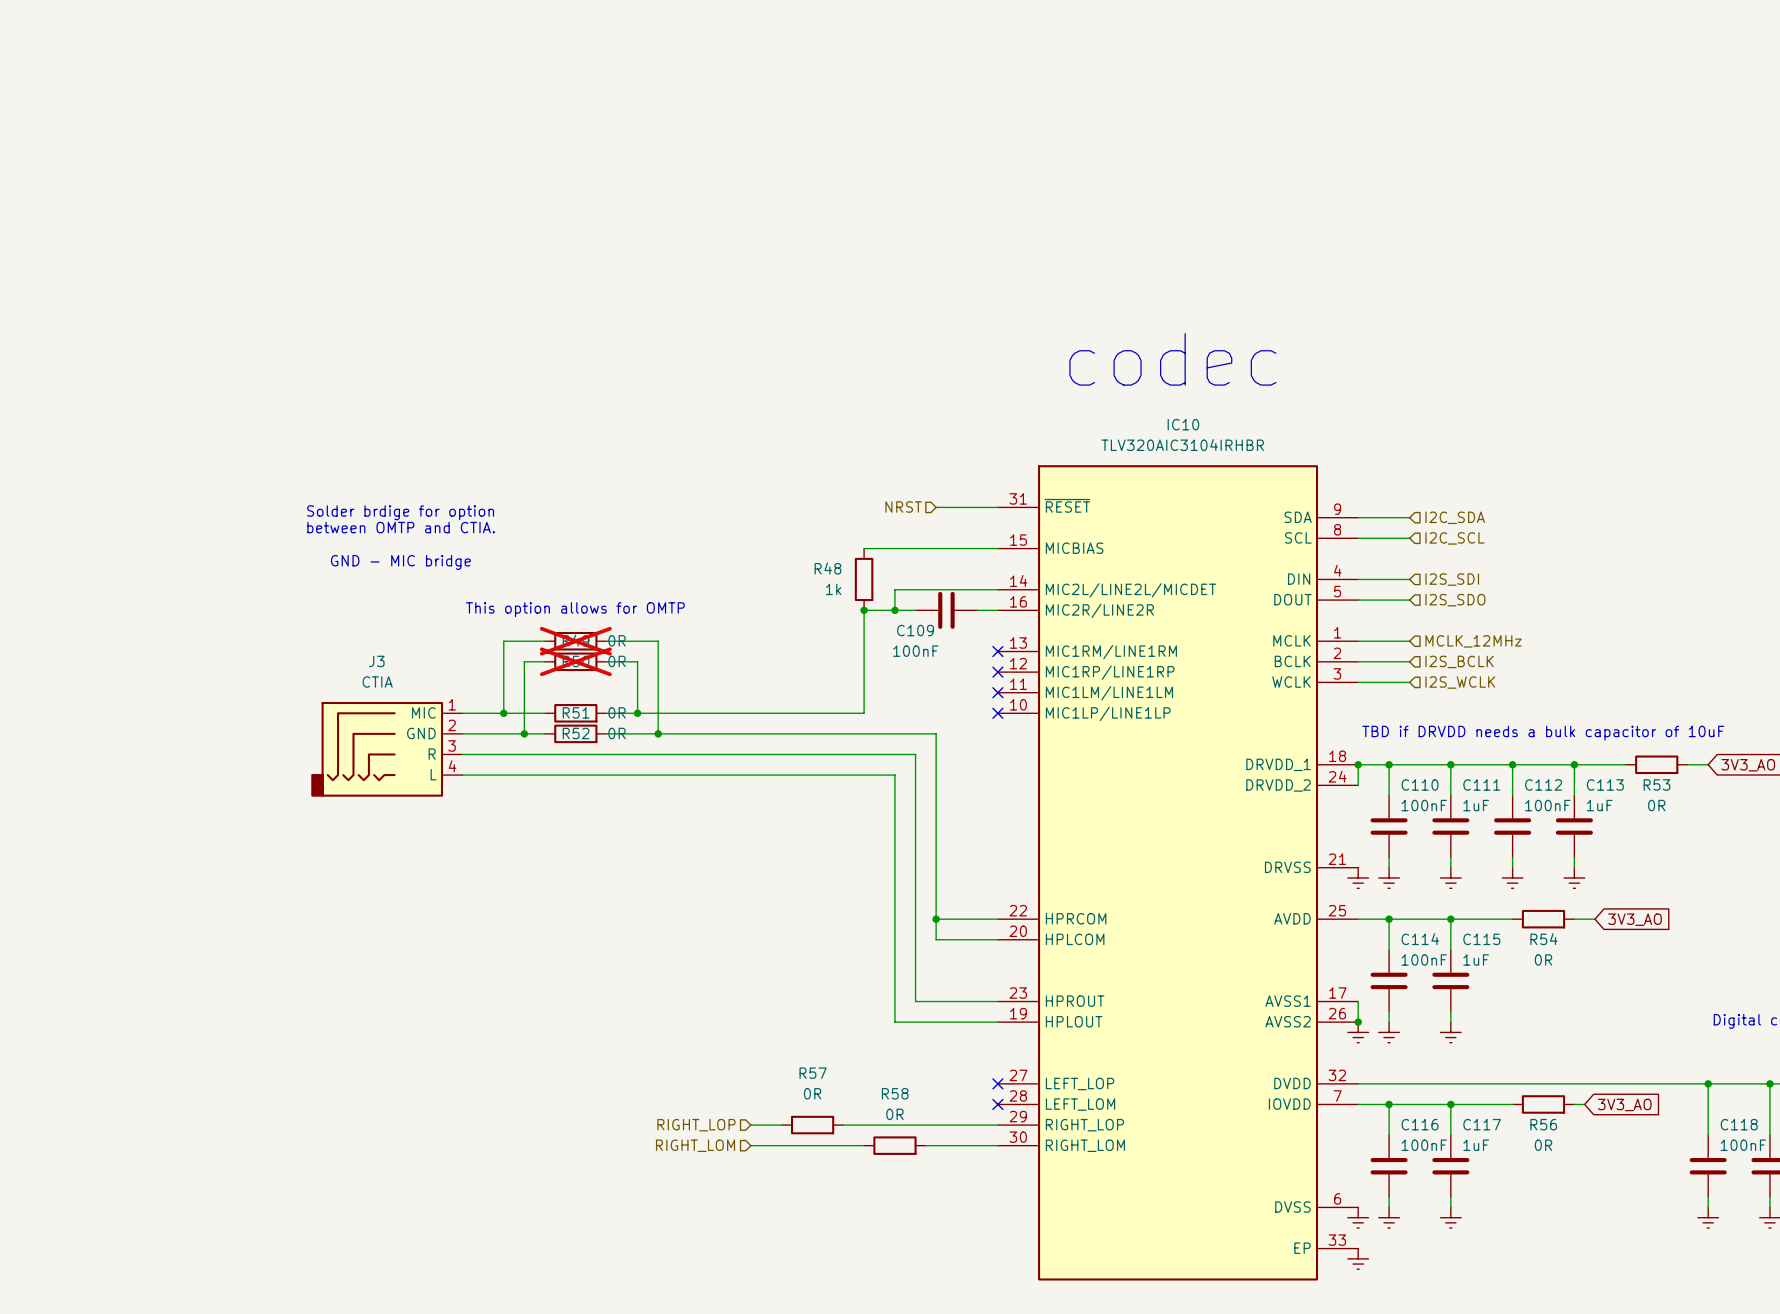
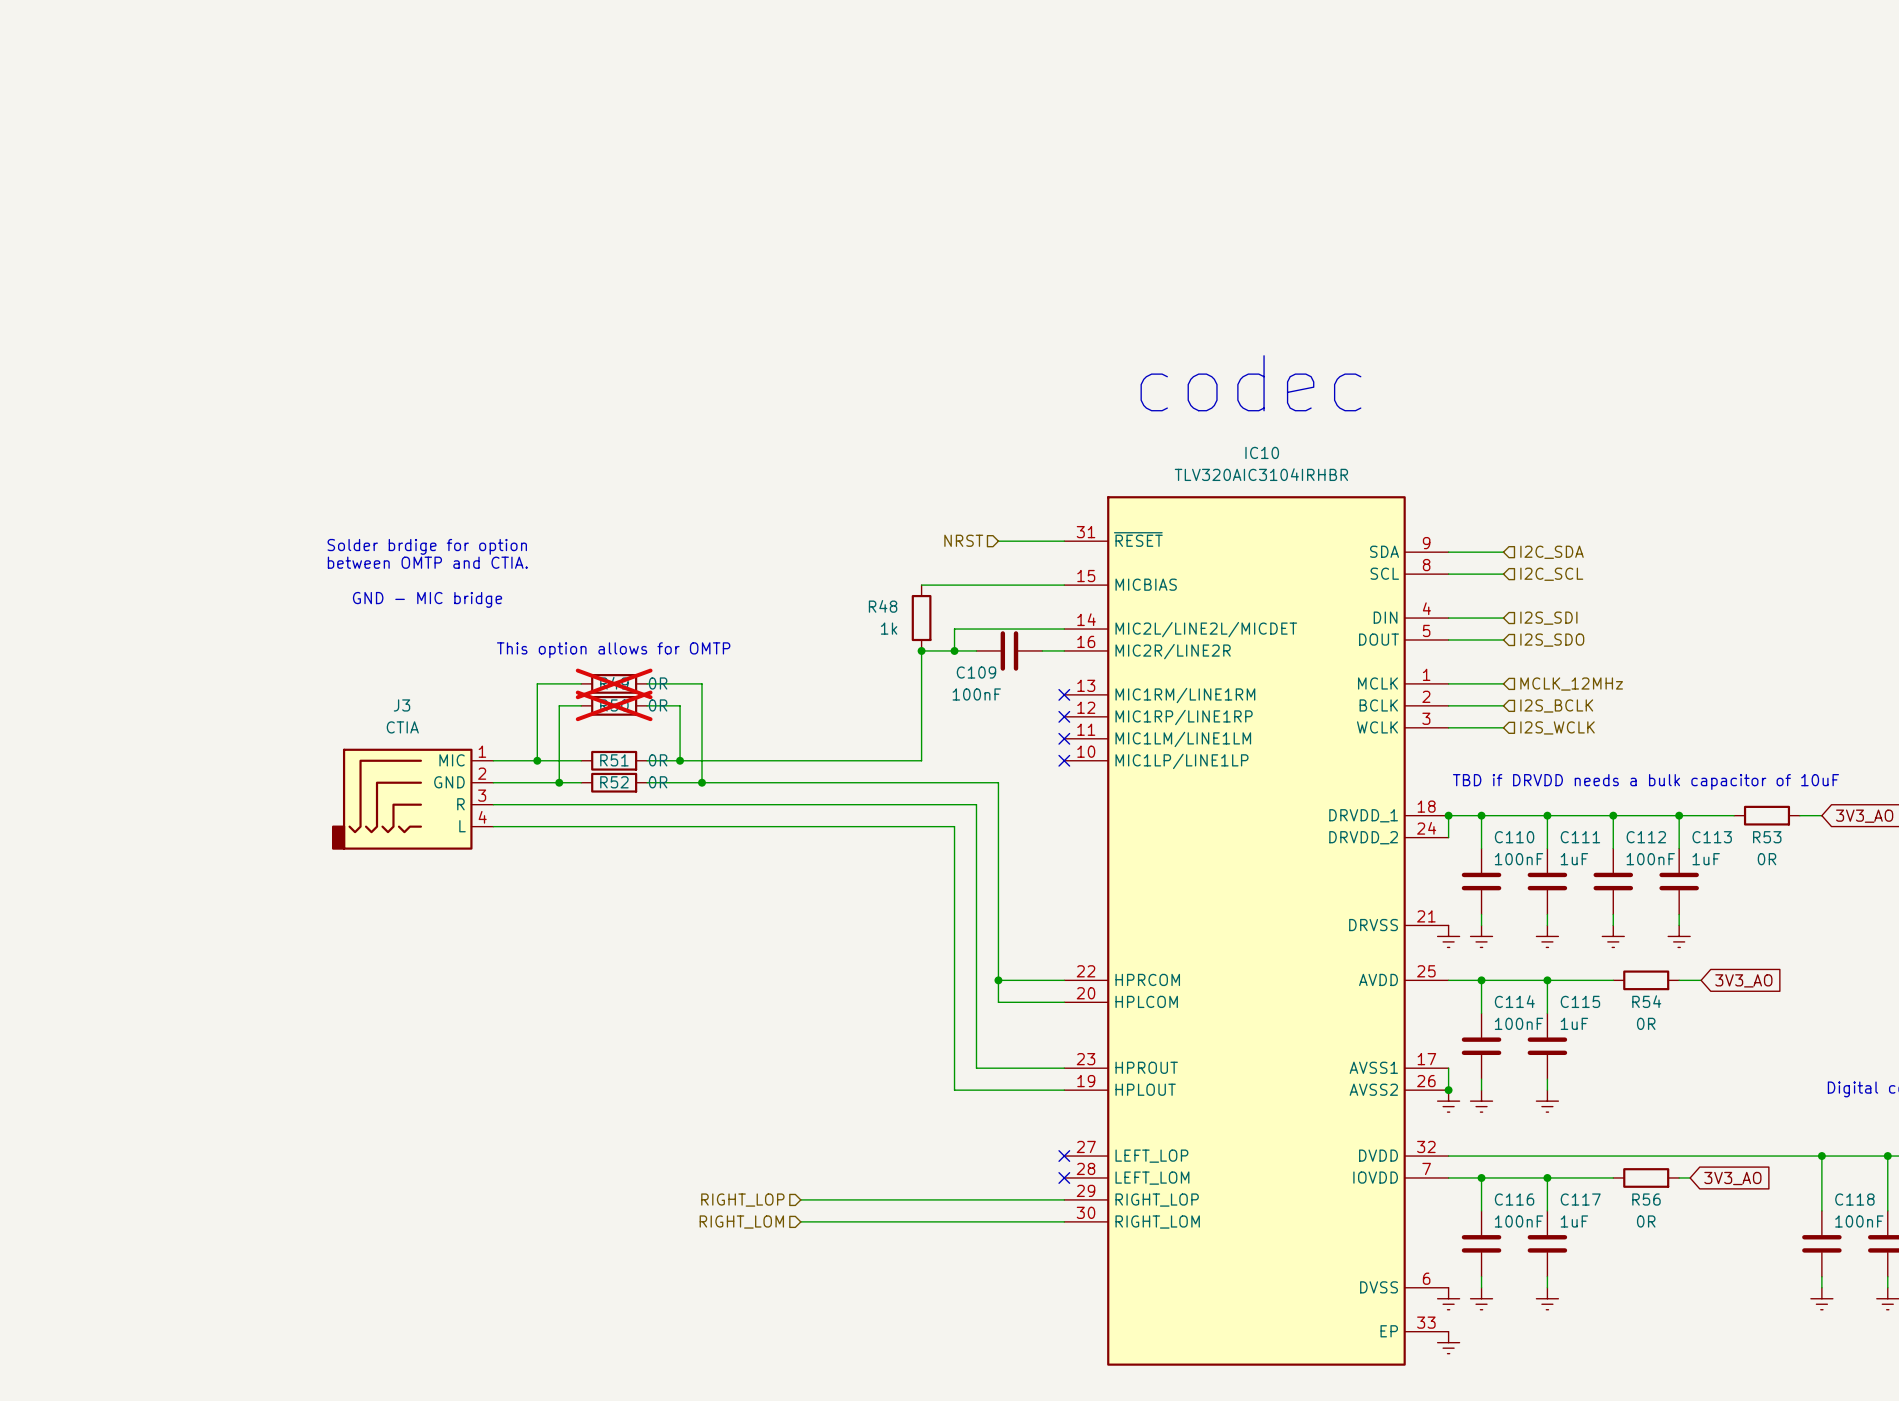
wire: none -> (833, 1199) (899, 1199)
R57: 0R (812, 1125) -> none
wire: none -> (921, 1221) (987, 1221)
R58: 0R (894, 1145) -> none

